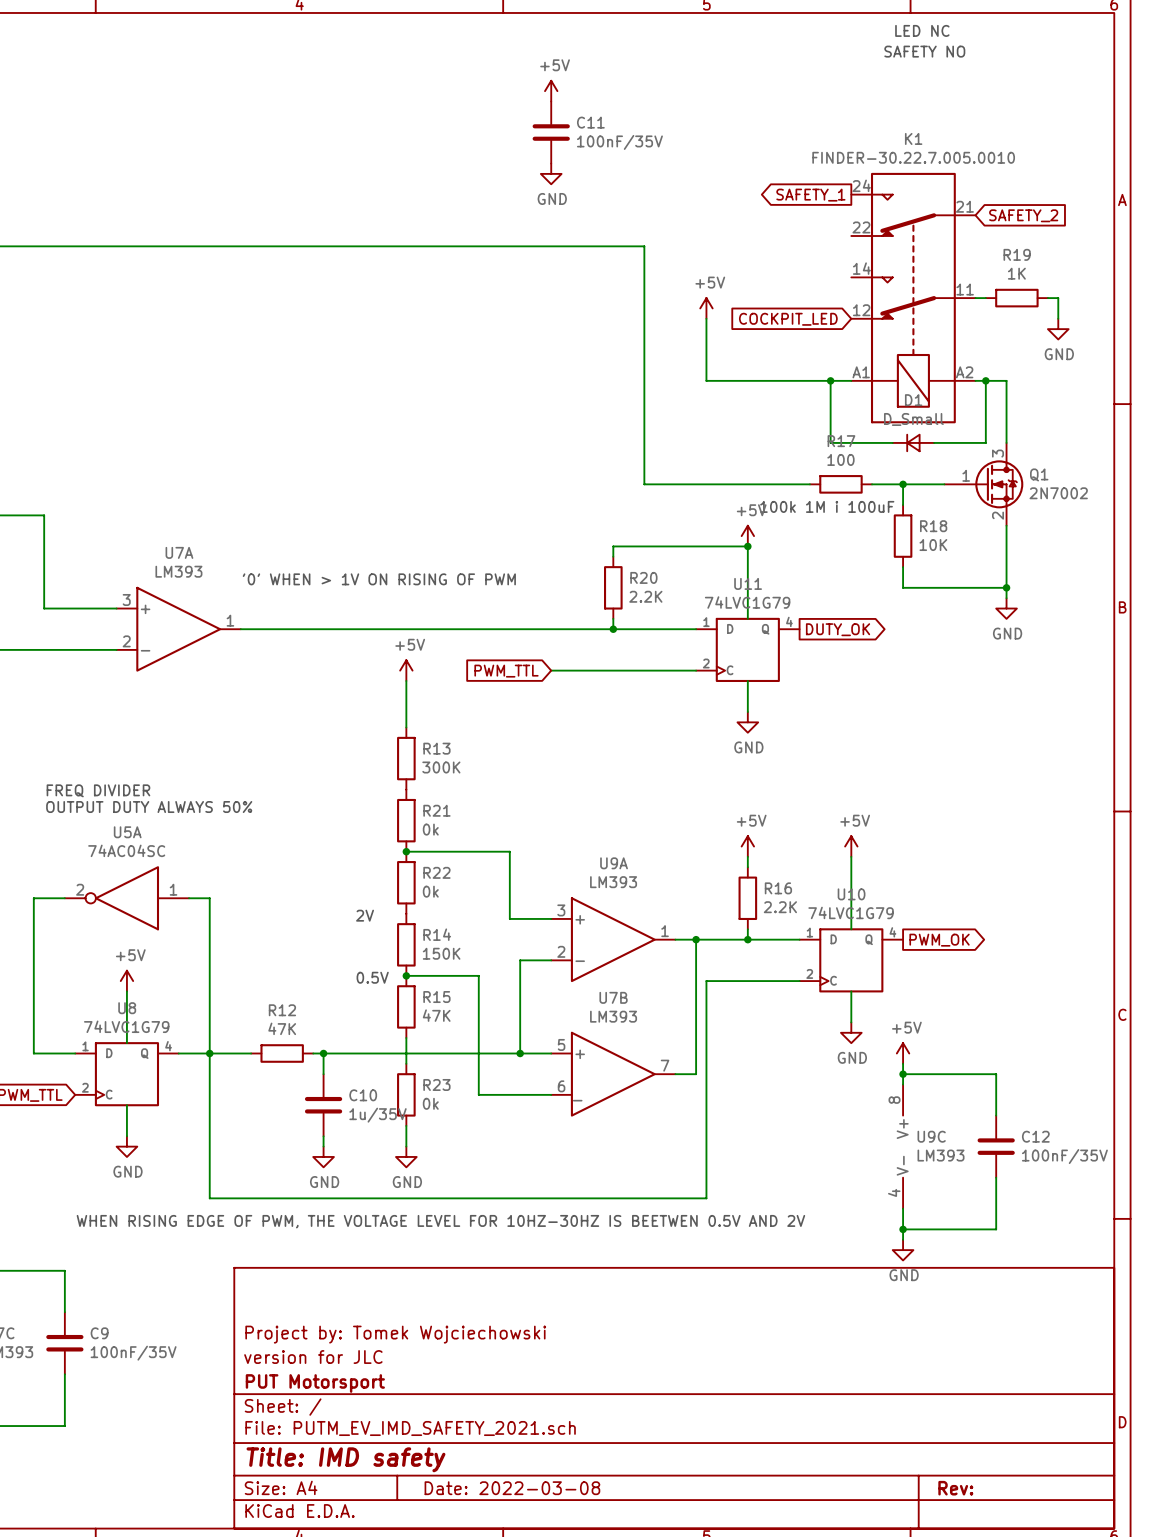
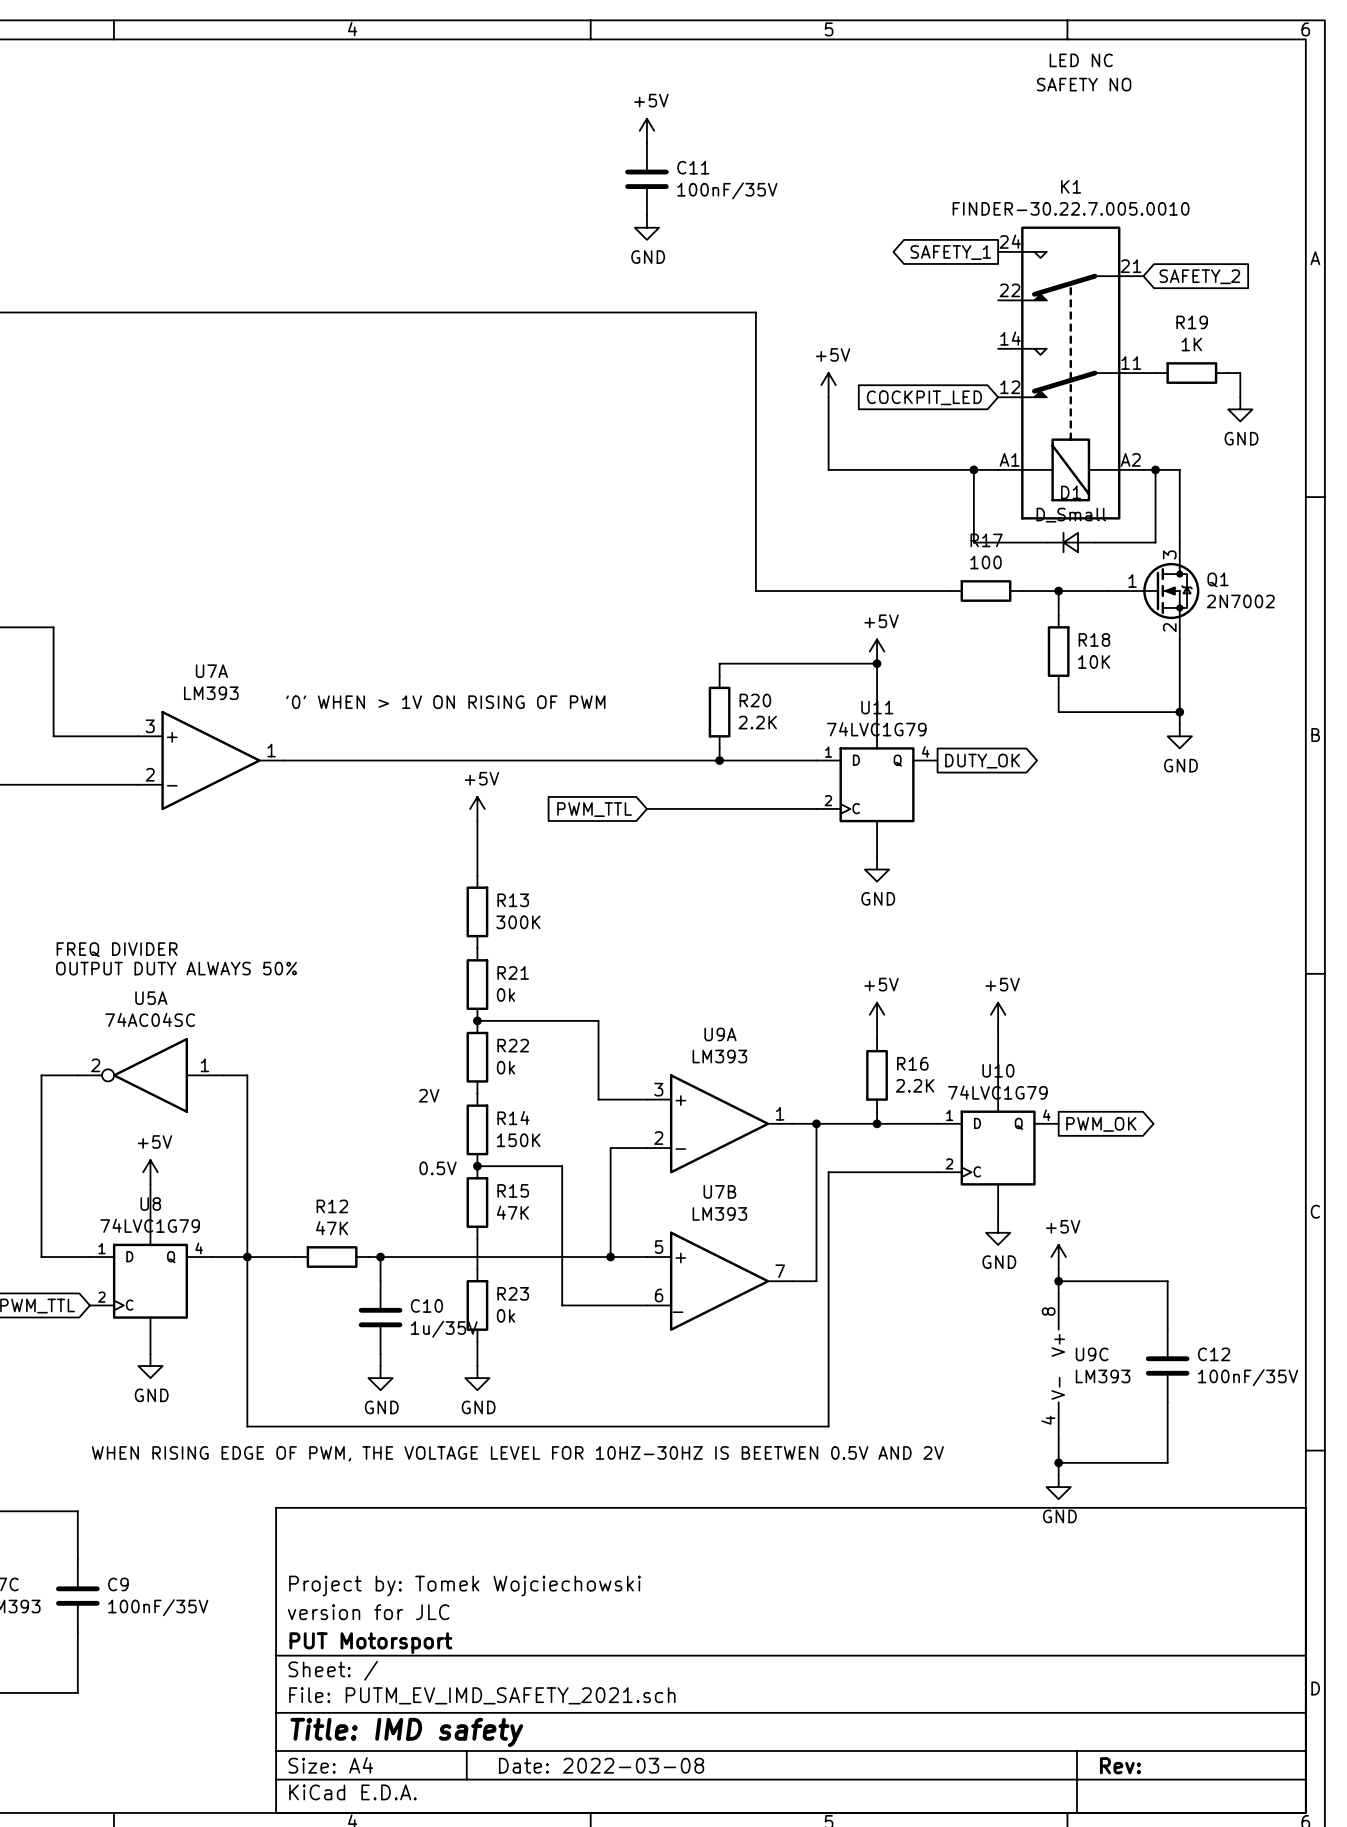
text: 100k 1M i 100uF (827, 506) -> none

